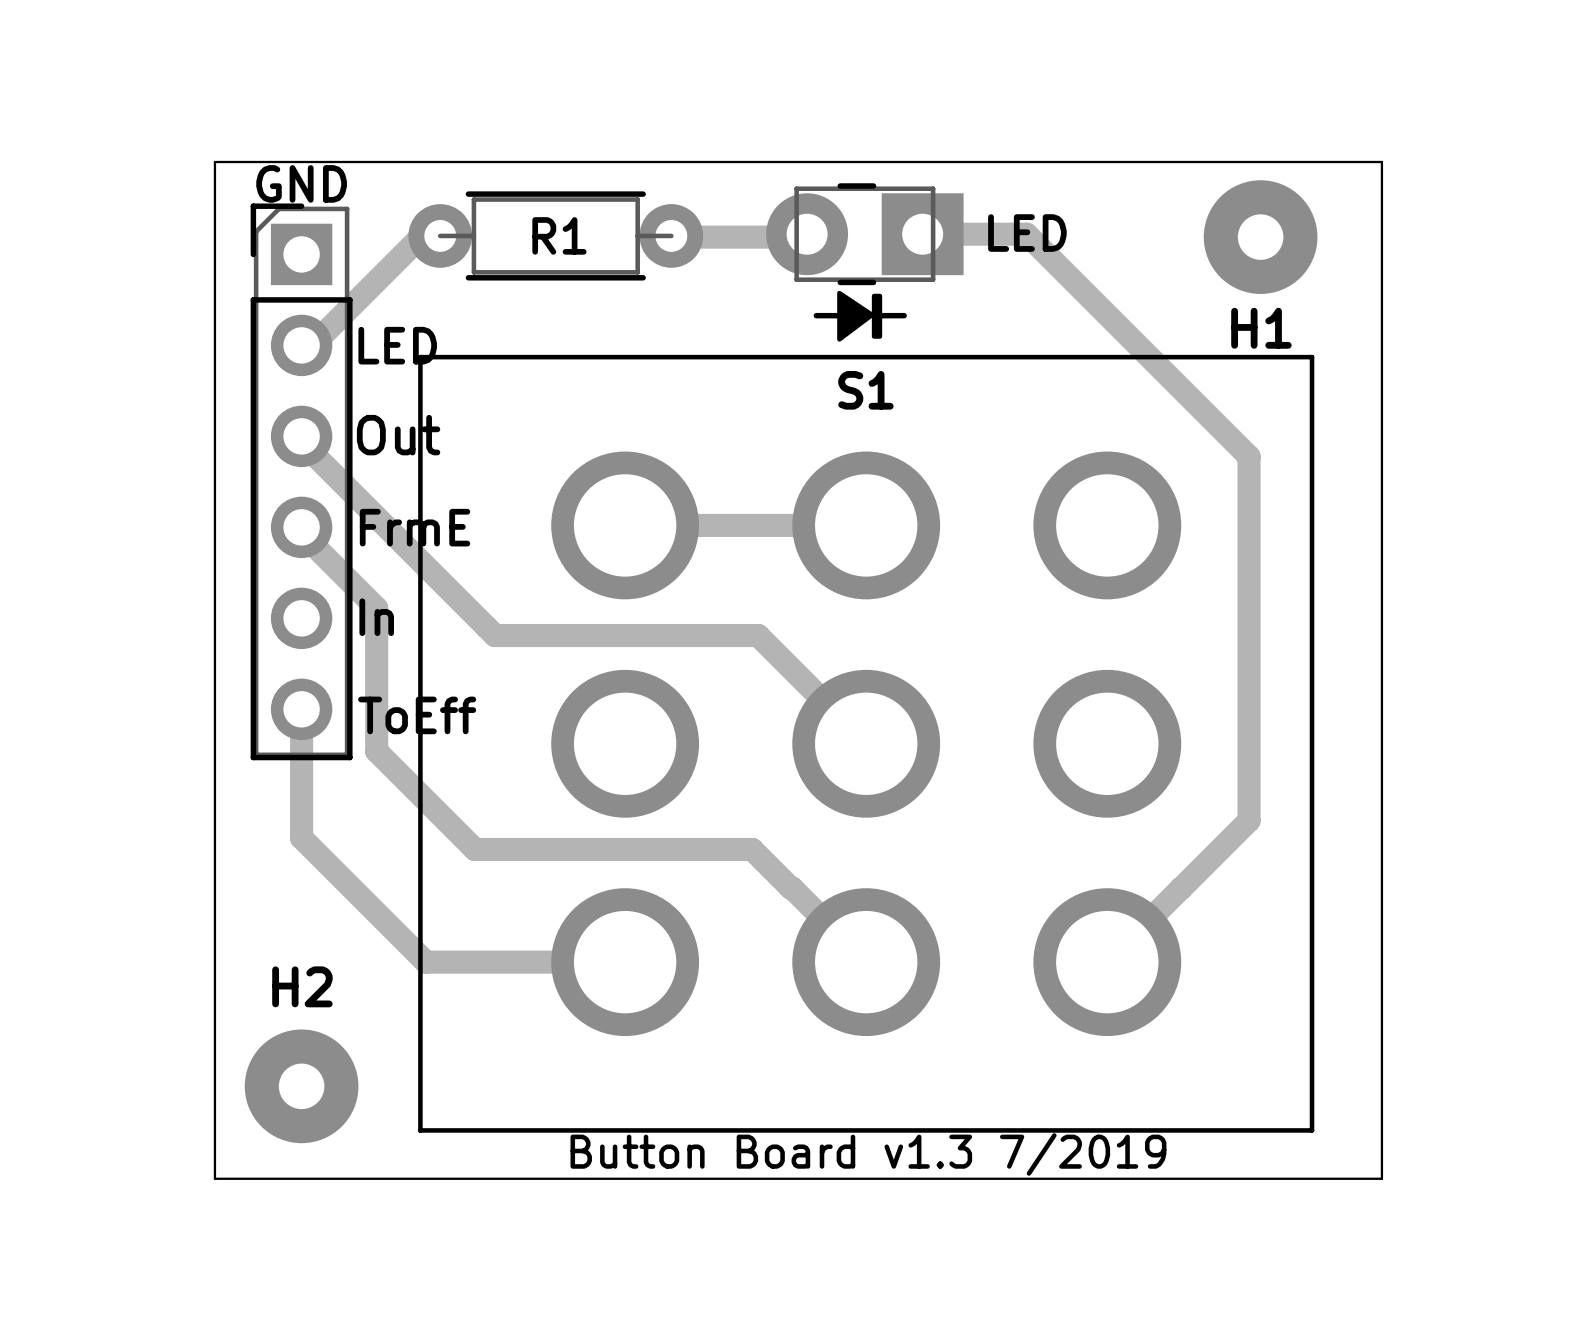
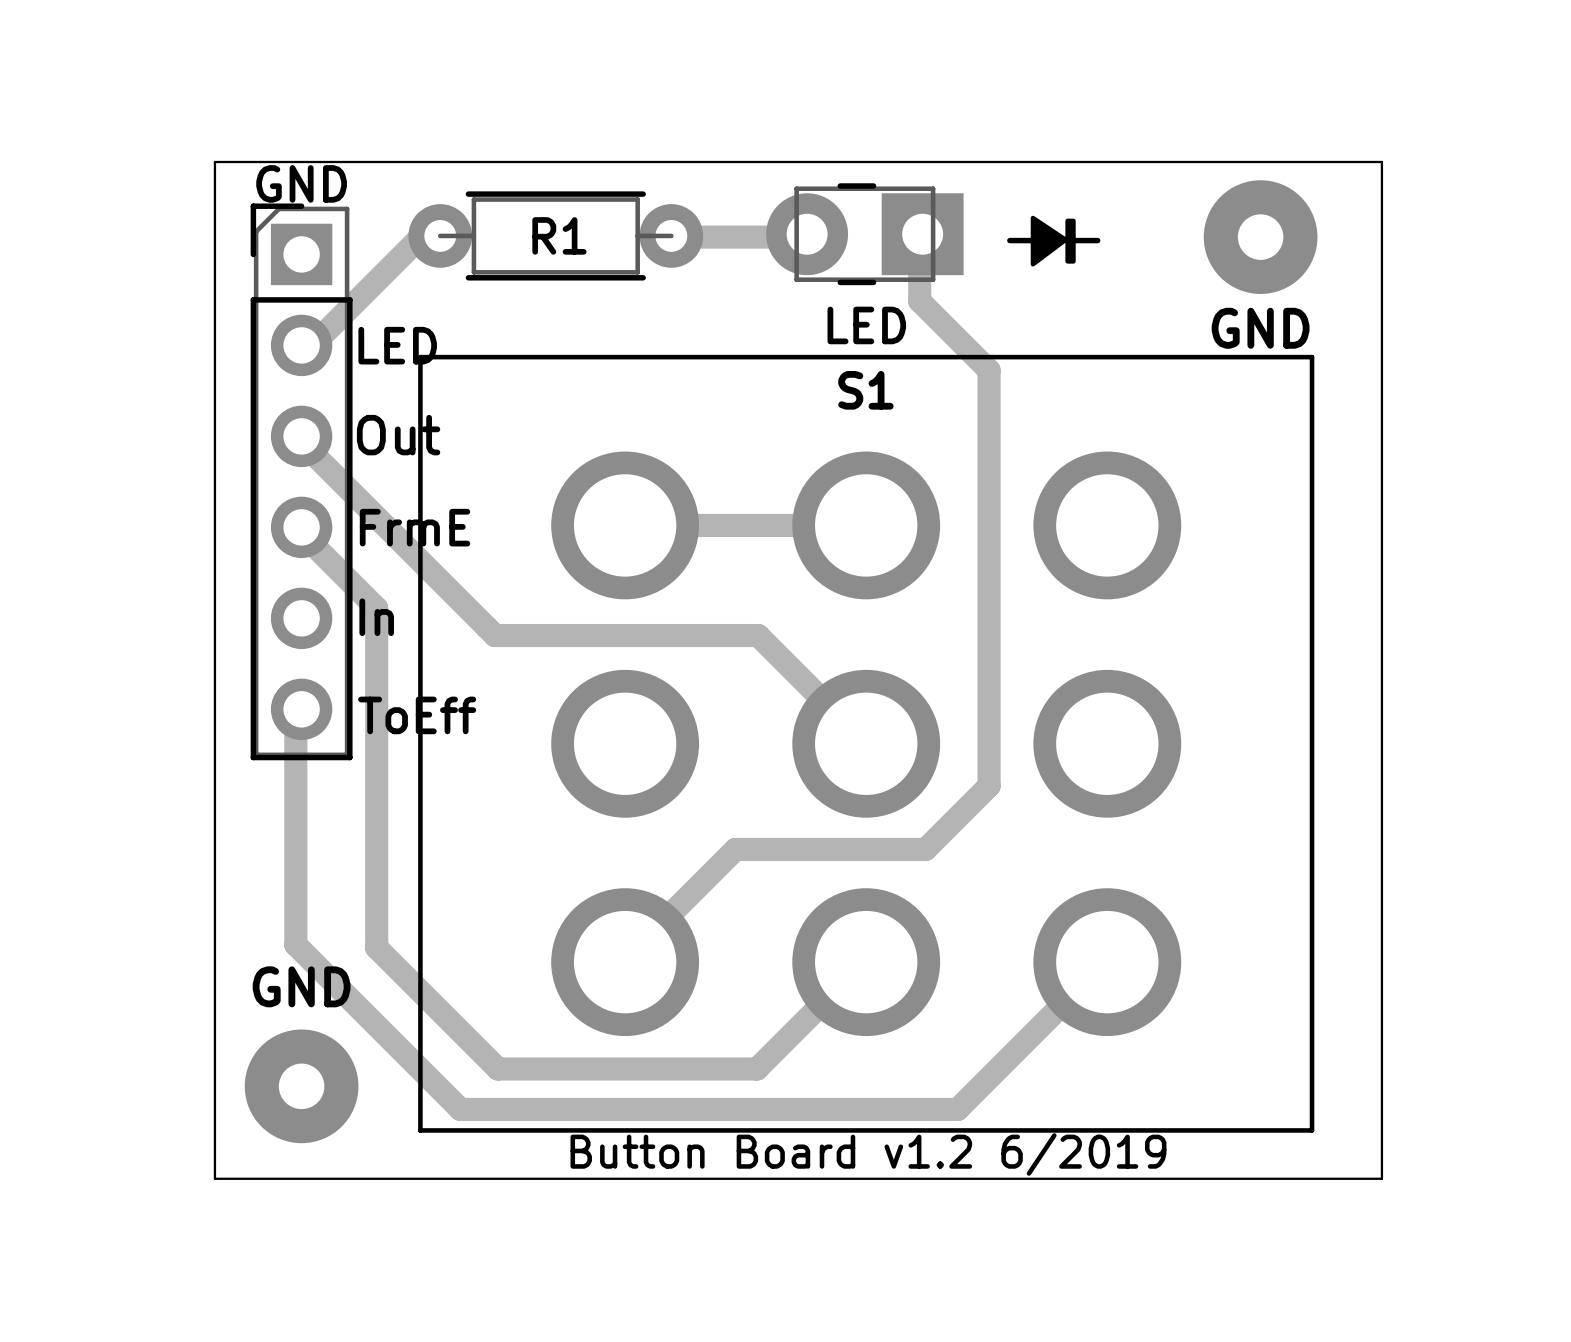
part value position: LED (1027, 233) -> LED (866, 325)
track: (922, 234) (1026, 234) (1249, 456) (1249, 820) (1107, 962) -> (295, 709) (295, 944) (460, 1109) (957, 1109) (1106, 960)
line: (816, 315) (839, 315) -> (1009, 240) (1032, 240)
line: (881, 315) (904, 315) -> (1074, 240) (1097, 240)
drawing position: (859, 316) -> (1053, 241)
H1 name: H1 (1261, 328) -> GND (1260, 328)
track: (301, 709) (301, 837) (425, 962) (625, 962) -> (735, 849) (624, 960)
track: (376, 751) (474, 849) (735, 849) -> (376, 751) (376, 947) (498, 1069) (757, 1069) (865, 960)
track: (752, 849) (866, 962) -> (752, 849) (925, 849) (989, 785) (989, 370) (919, 301) (919, 237)
H2 name: H2 (302, 986) -> GND (301, 986)
text: Button Board v1.3 7/2019 (868, 1154) -> Button Board v1.2 6/2019 (868, 1154)

